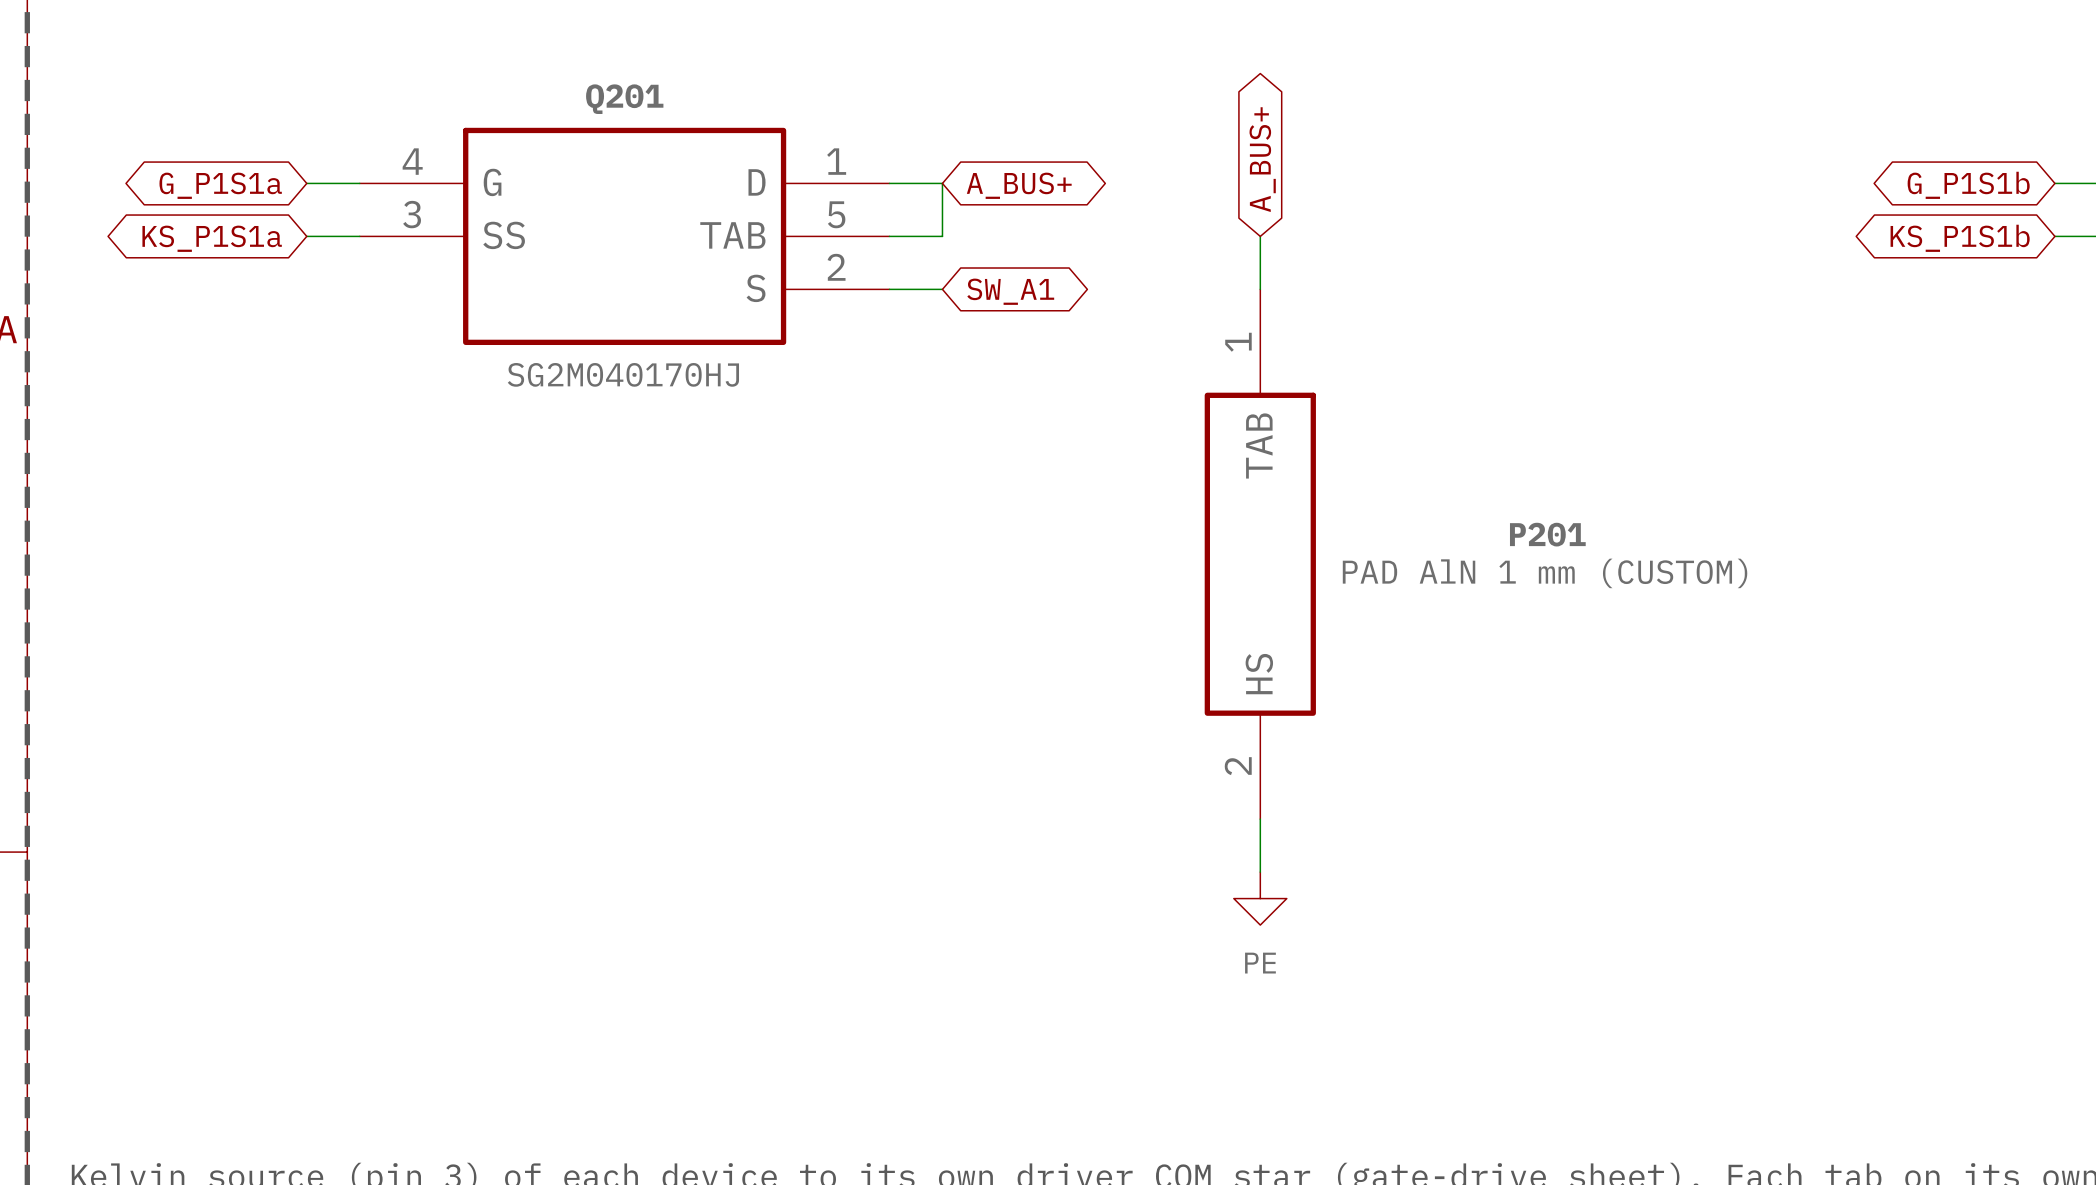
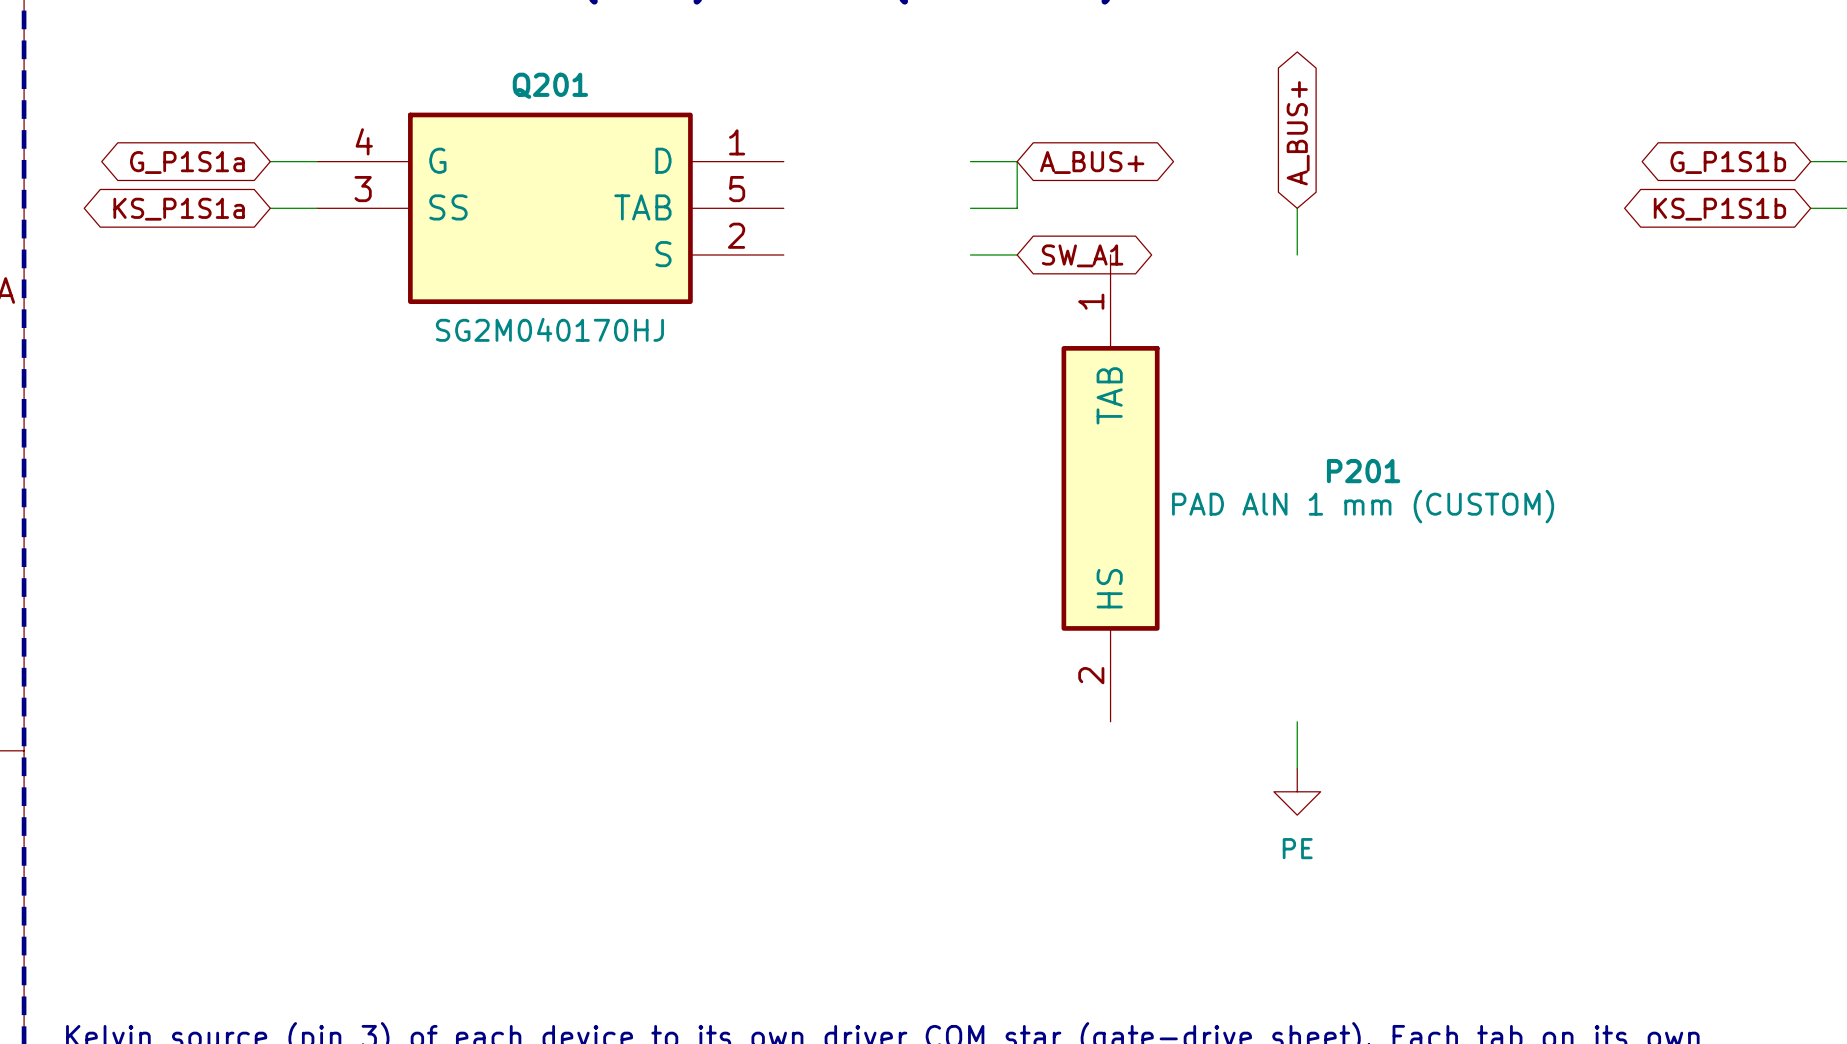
global label rotation: 0° (1262, 159) -> 90° clockwise (1092, 162)
global label: none -> A_BUS+ (1298, 133)
wire: (889, 183) (942, 183) (942, 236) (889, 236) -> (970, 161) (1017, 161) (1017, 208) (970, 208)
global label: A_BUS+ (1019, 185) -> none
wire: (1260, 236) (1260, 289) -> (1297, 208) (1297, 254)
wire: (889, 289) (942, 289) -> (970, 254) (1017, 254)
global label position: SW_A1 (1010, 291) -> SW_A1 (1082, 255)
wire: (1260, 819) (1260, 872) -> (1297, 721) (1297, 768)
power symbol position: PE (1260, 898) -> PE (1297, 791)

